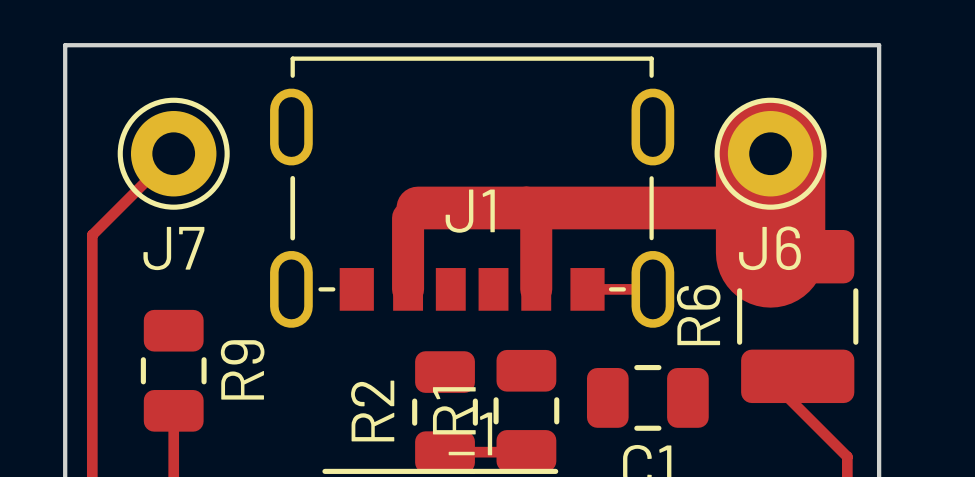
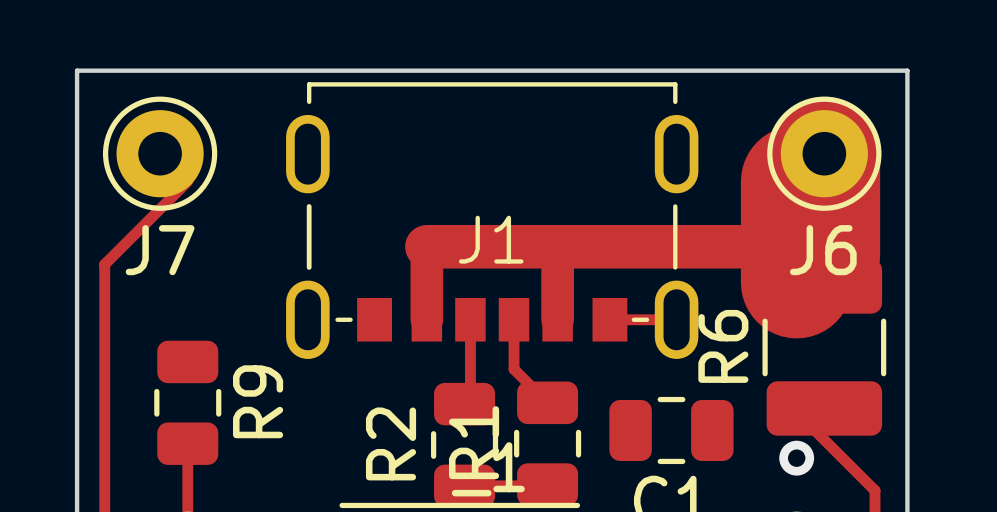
top track: none -> (824, 153) (824, 254) (816, 246) (426, 246)
J7 position: (173, 153) -> (160, 153)
J6 position: (770, 153) -> (824, 153)
top track: (417, 207) (716, 207) -> none
top track: none -> (470, 319) (470, 398) (464, 404)
top track: none -> (514, 319) (514, 369) (547, 402)
via: none -> (796, 458)

